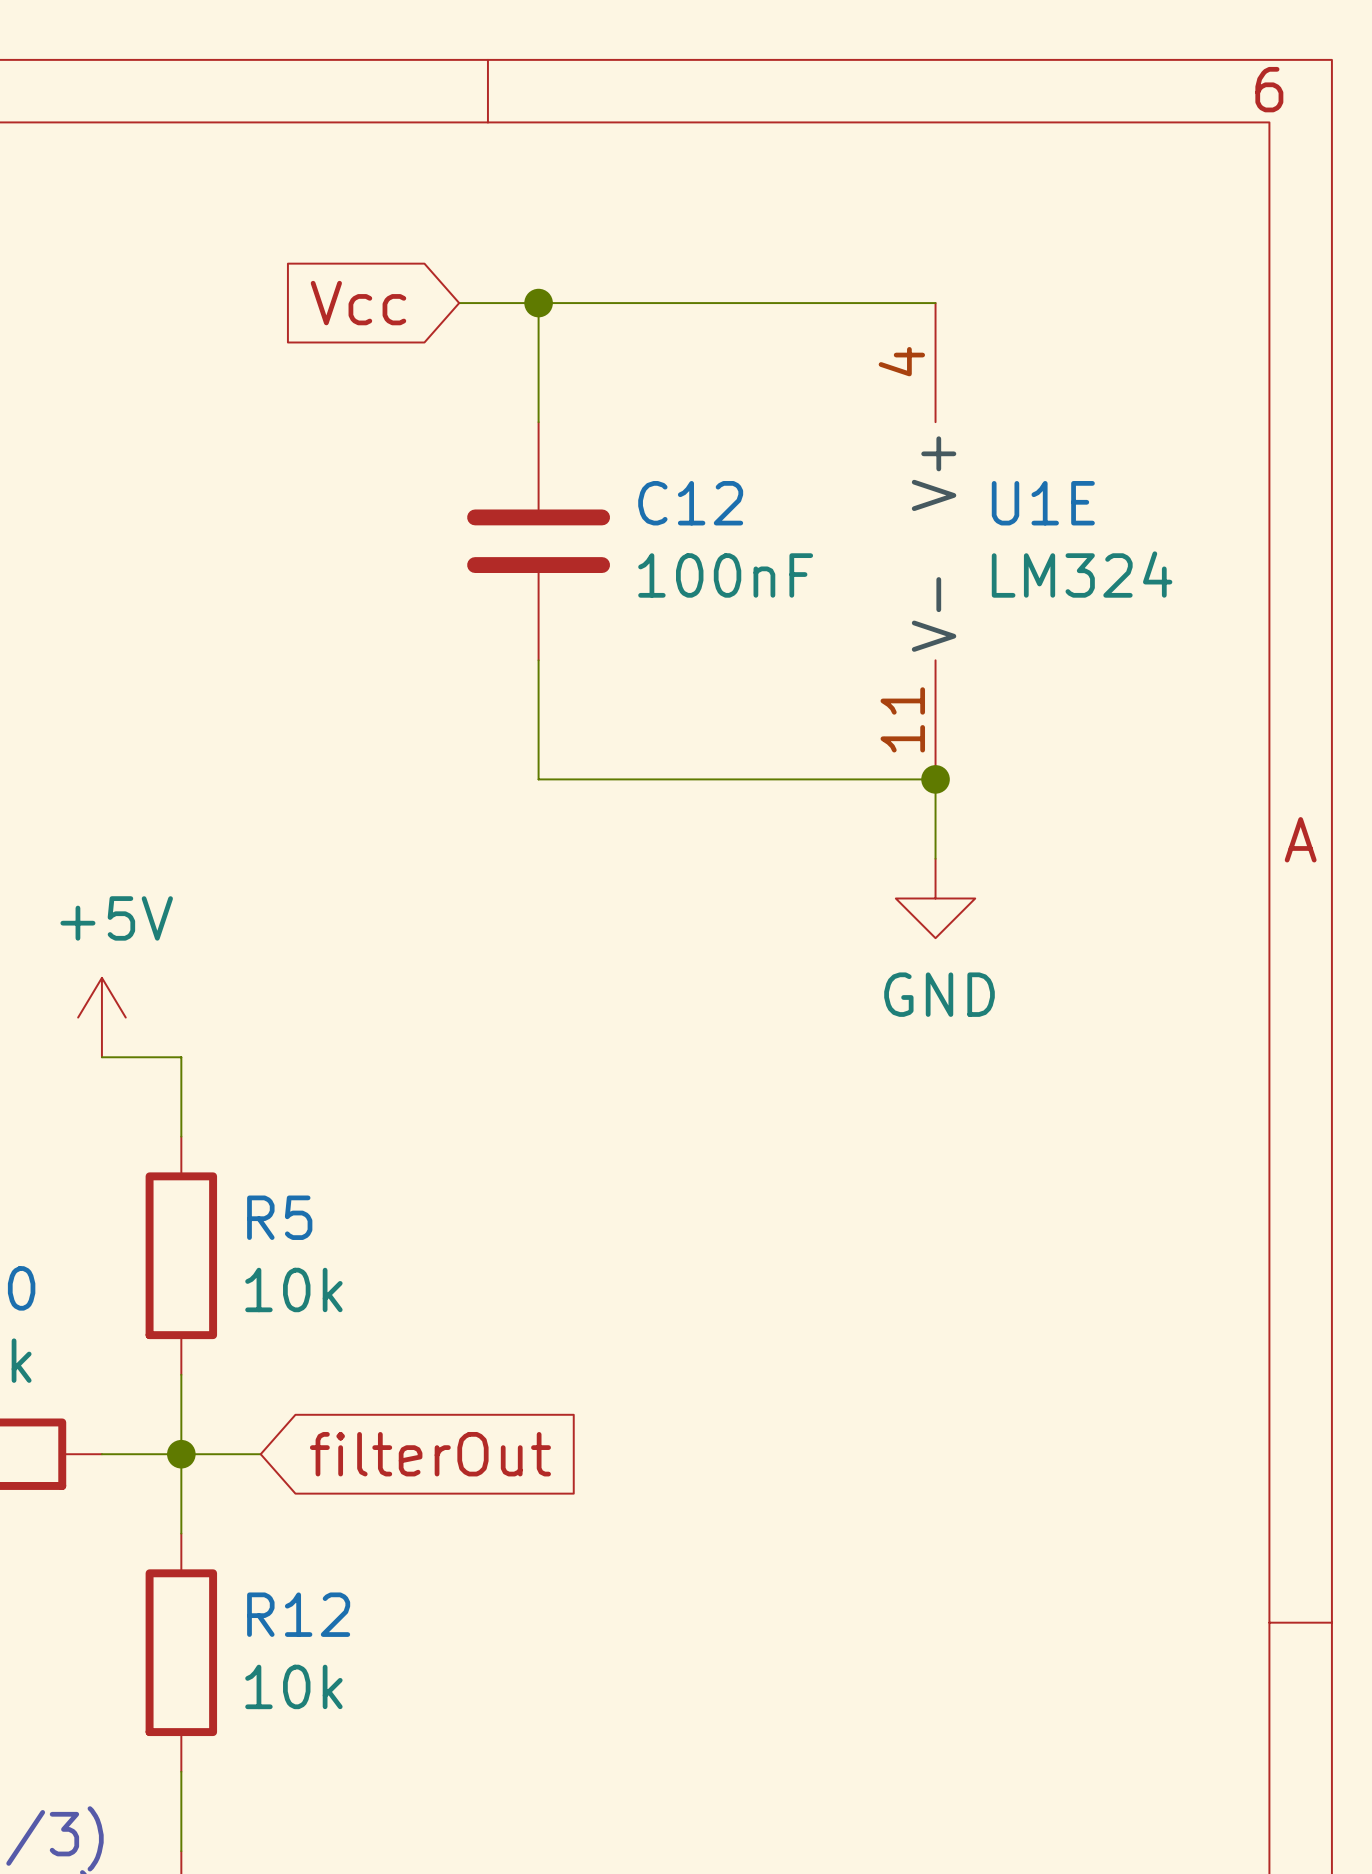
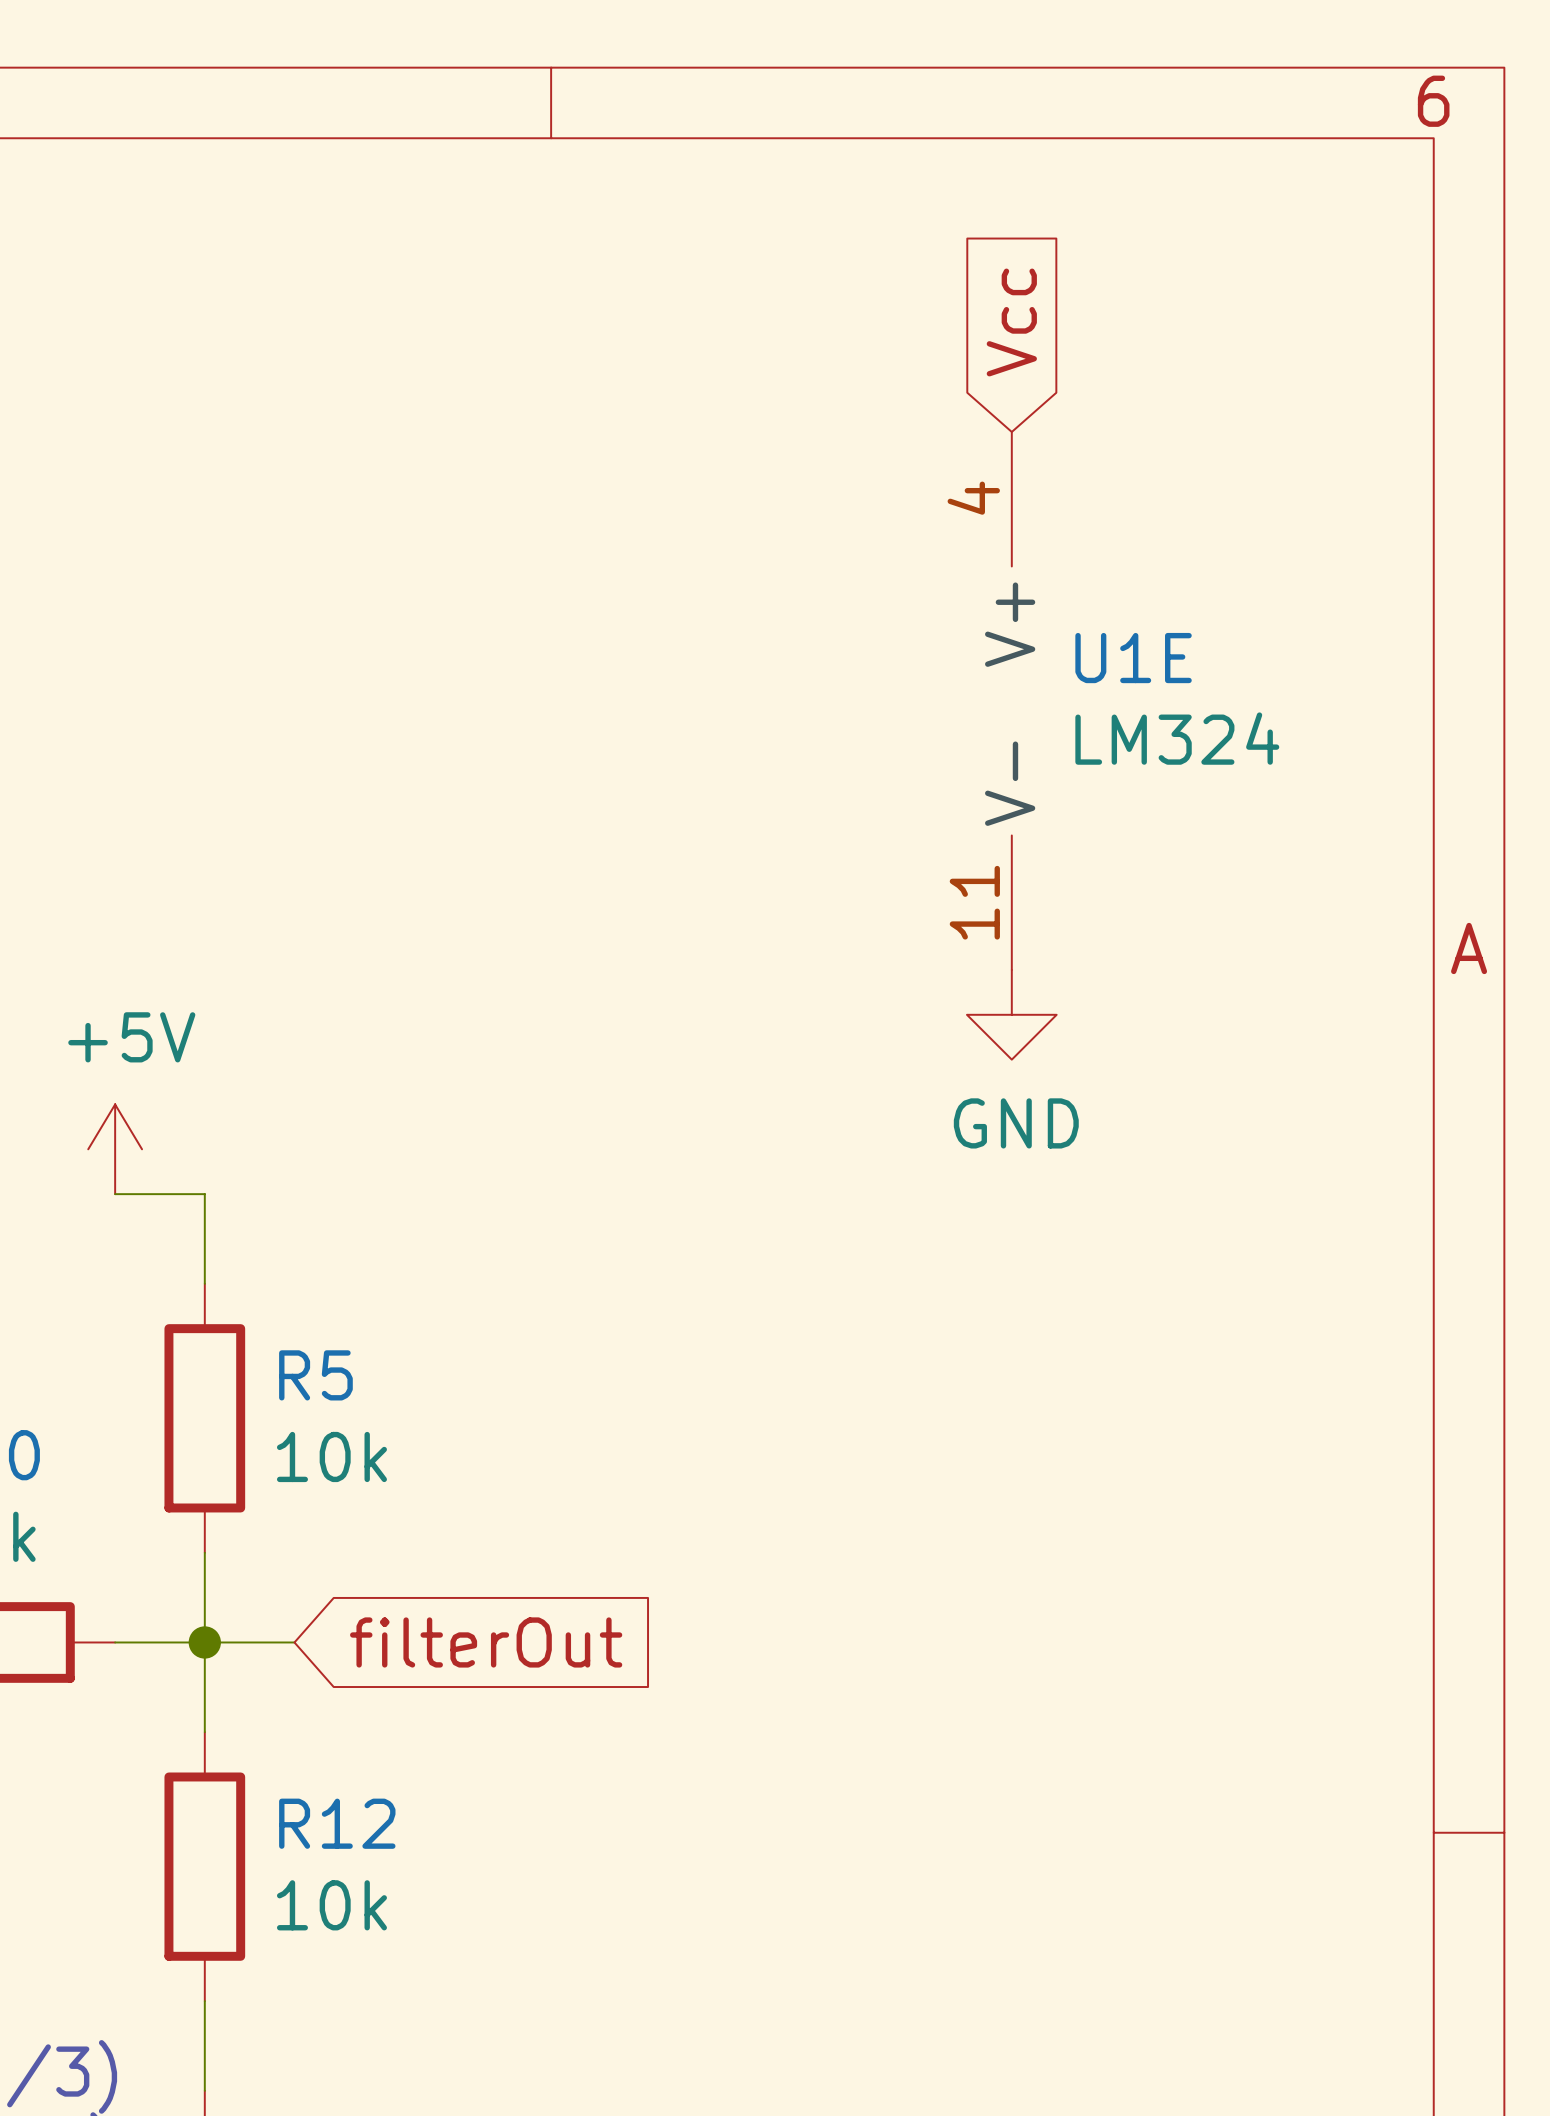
global label rotation: 0° (358, 303) -> 90° clockwise (1011, 322)
global label position: Vcc (358, 303) -> Vcc (1011, 322)
wire: (459, 303) (935, 303) -> none
wire: (538, 303) (538, 422) -> none
junction: (538, 303) -> none
C12: 100nF (538, 541) -> none
U1E position: (935, 541) -> (1011, 700)
wire: (538, 660) (538, 779) (935, 779) (935, 858) -> none
junction: (935, 779) -> none
power symbol position: GND (935, 898) -> GND (1011, 1014)

